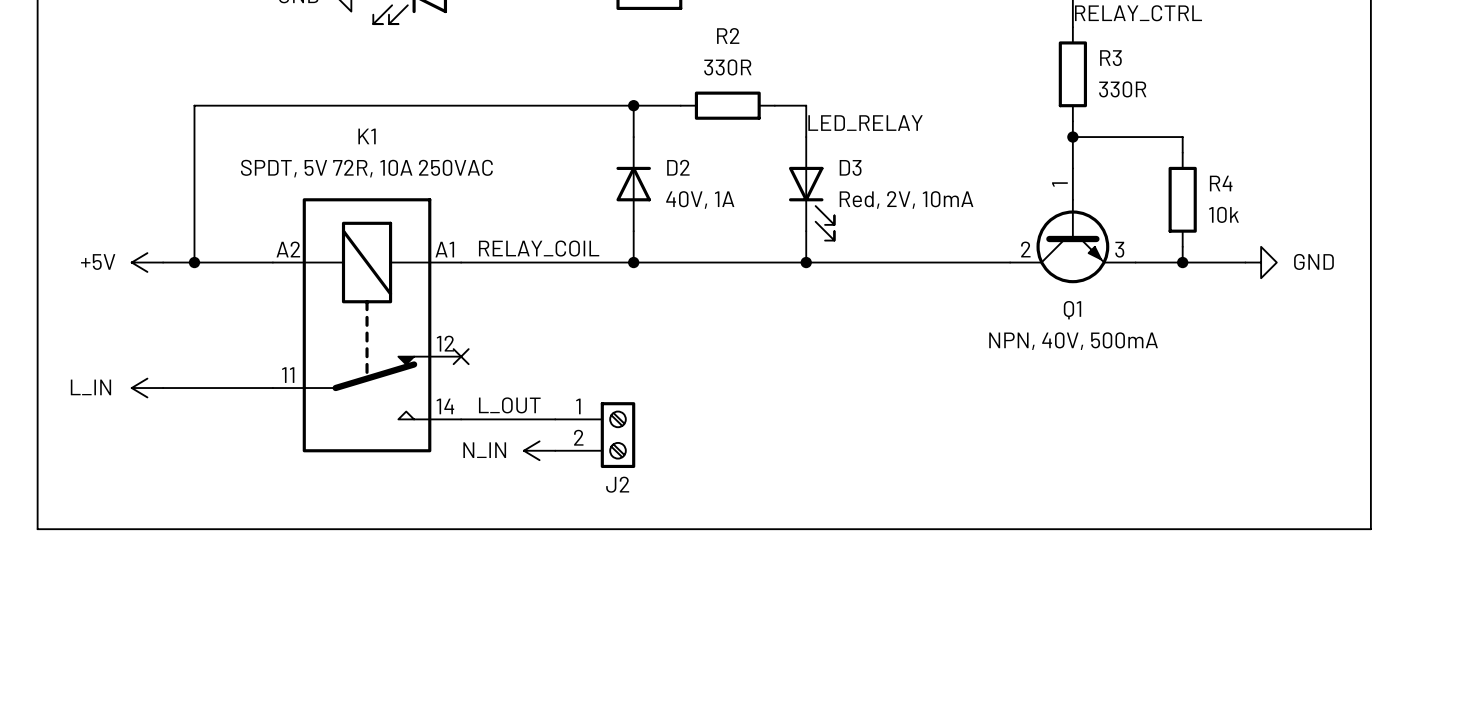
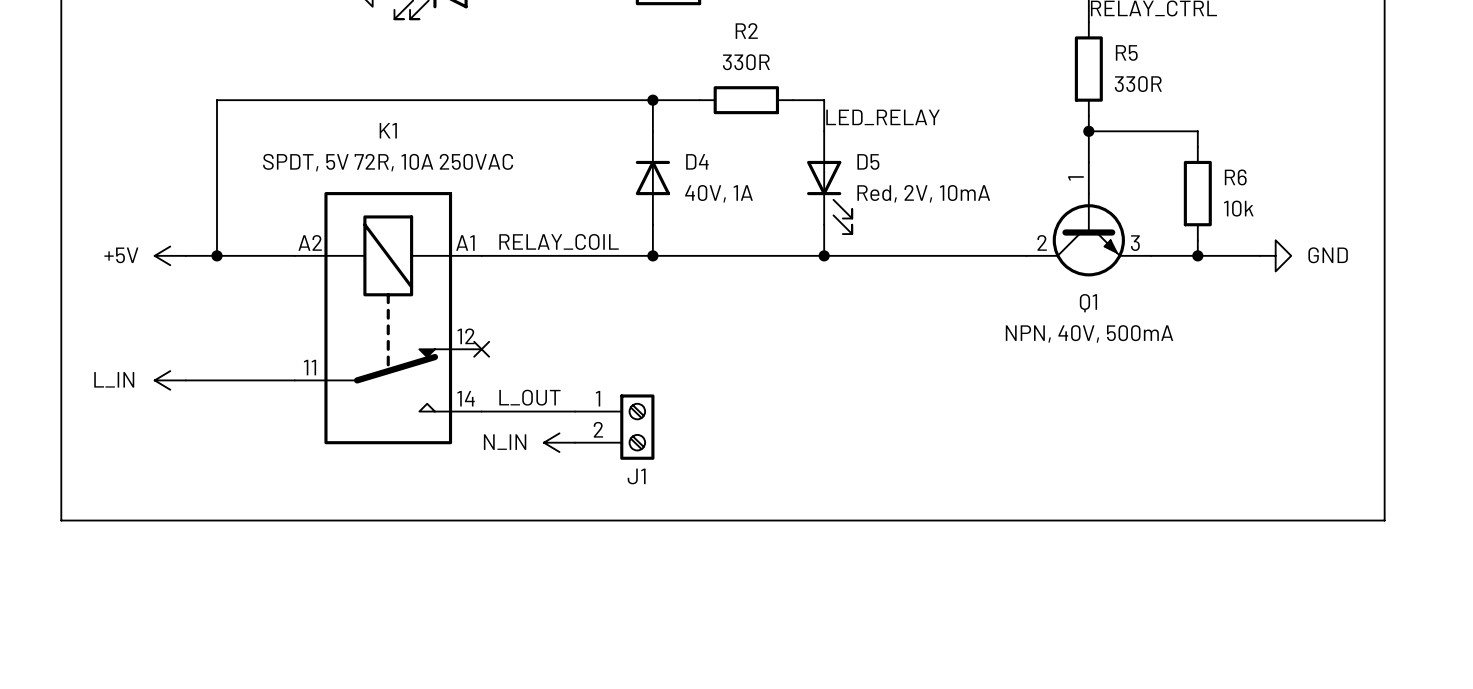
R3 name: R3 (1110, 58) -> R5 (1126, 52)
D2 name: D2 (678, 167) -> D4 (697, 161)
D3 name: D3 (850, 167) -> D5 (868, 161)
R4 name: R4 (1221, 183) -> R6 (1235, 177)
J2 name: J2 (617, 484) -> J1 (636, 476)

